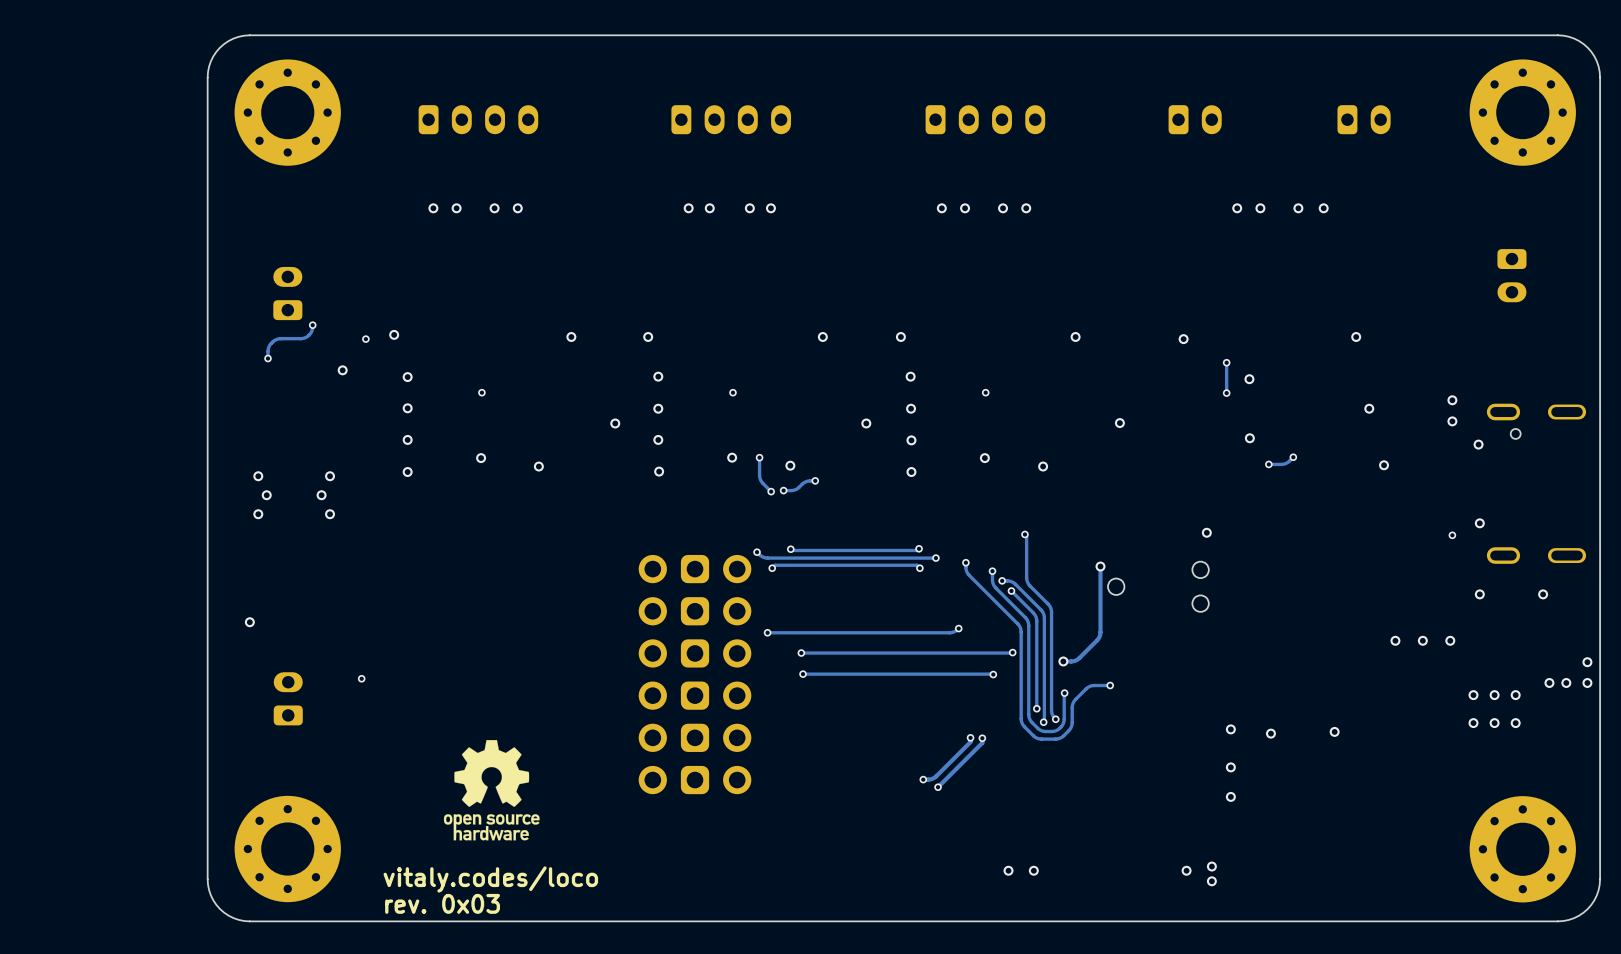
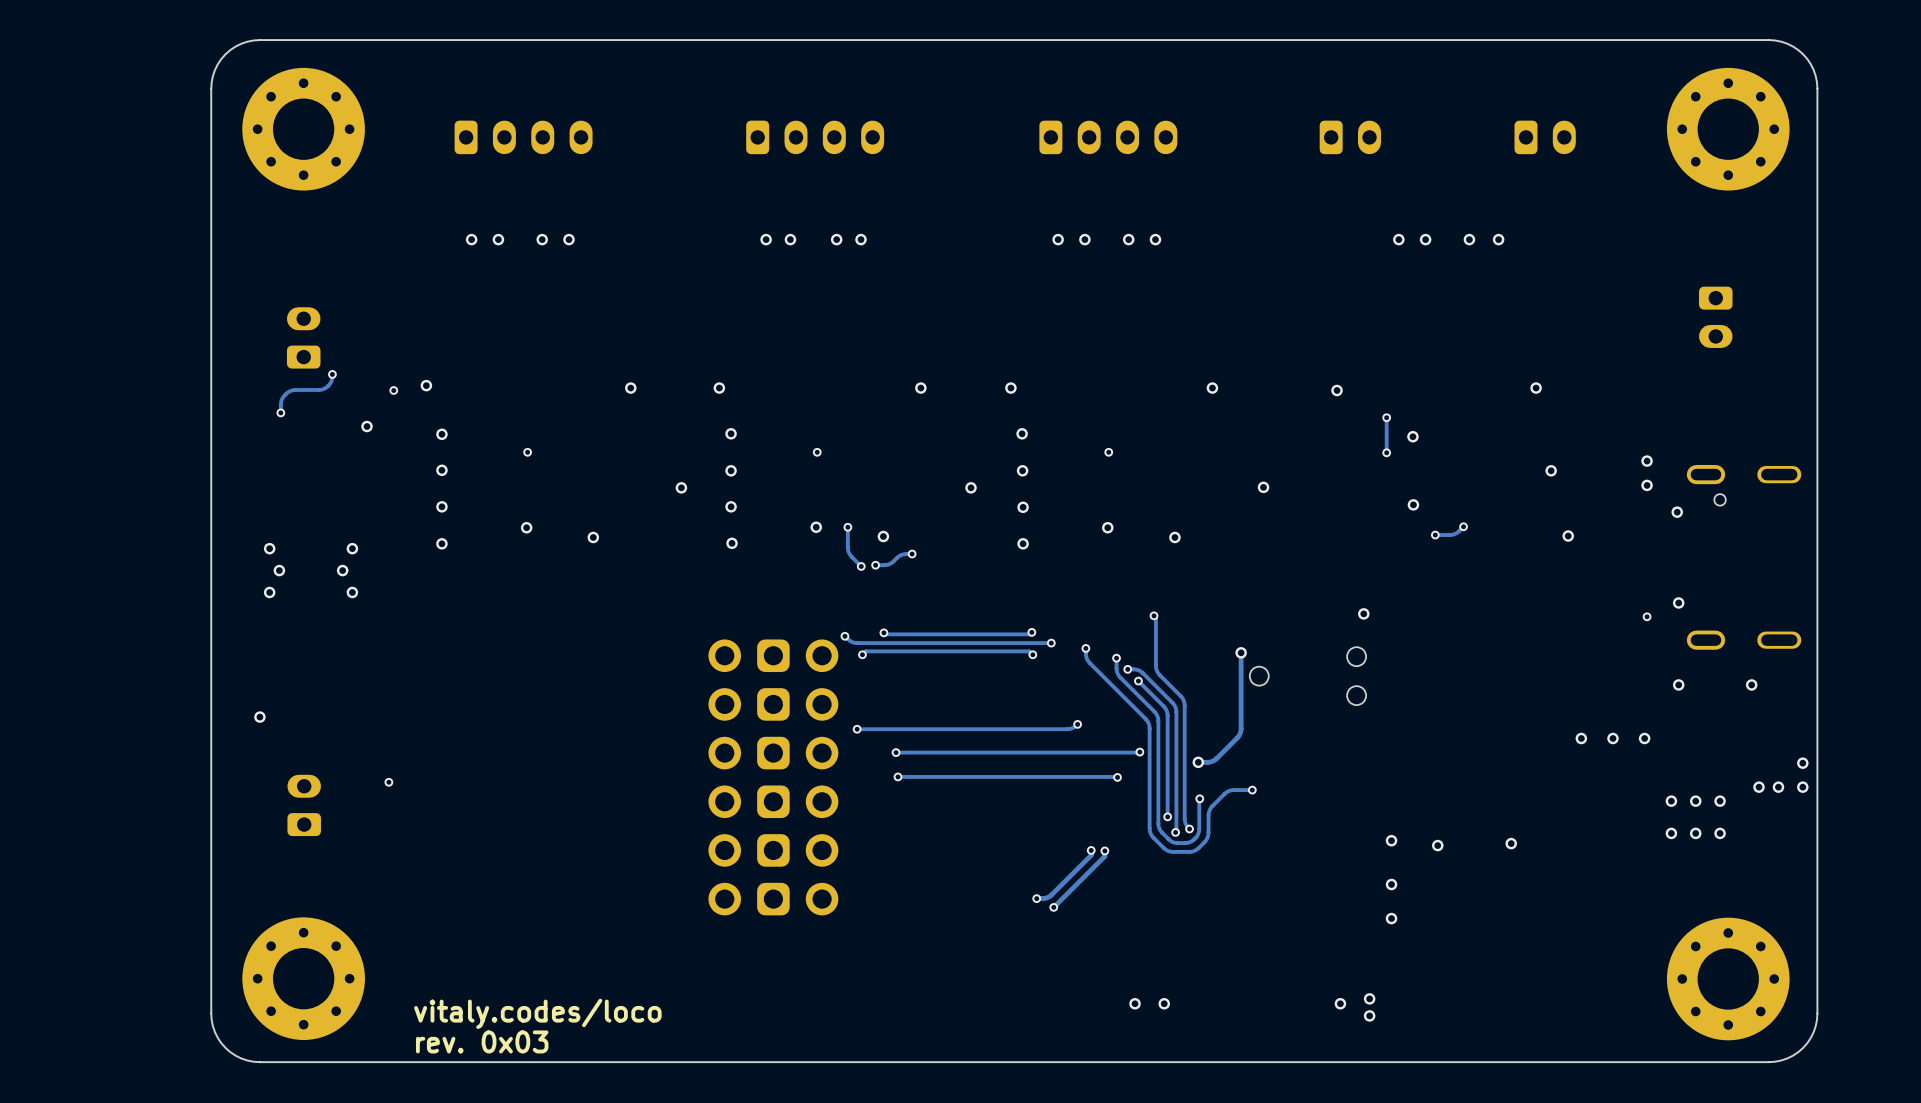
drawing: [443, 740, 540, 841] -> none

